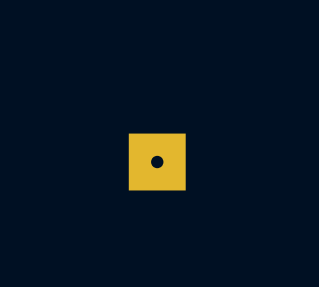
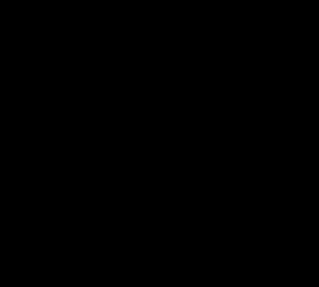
part: (157, 162) -> none

